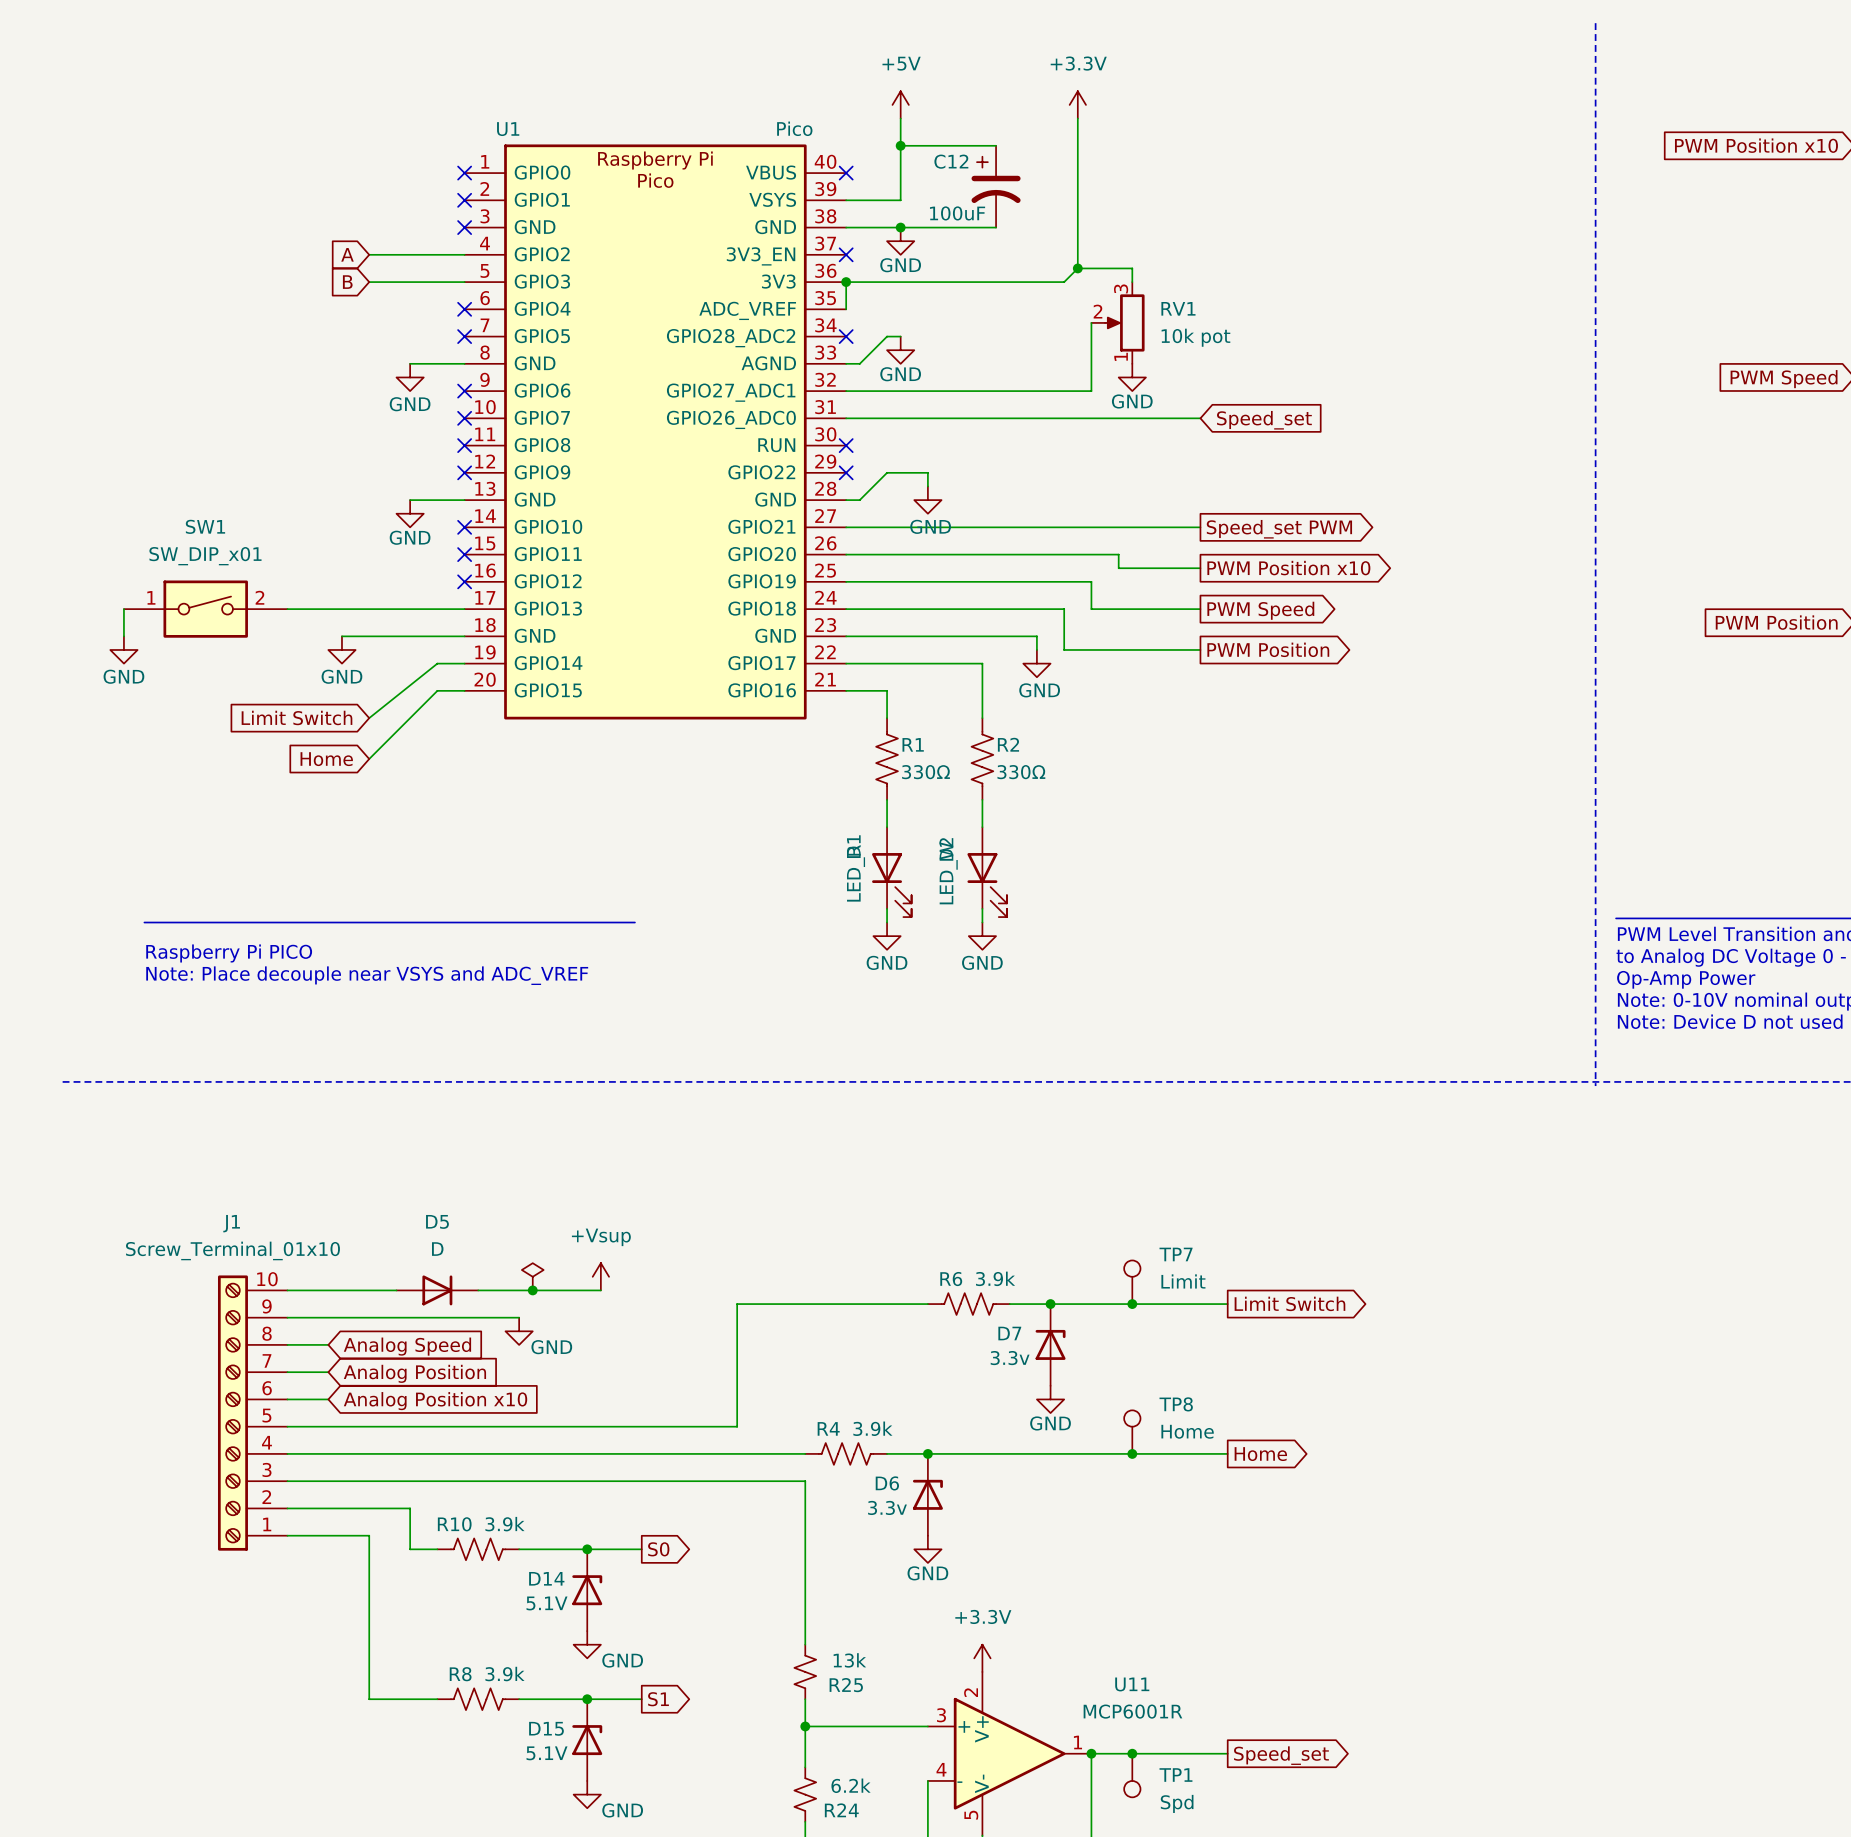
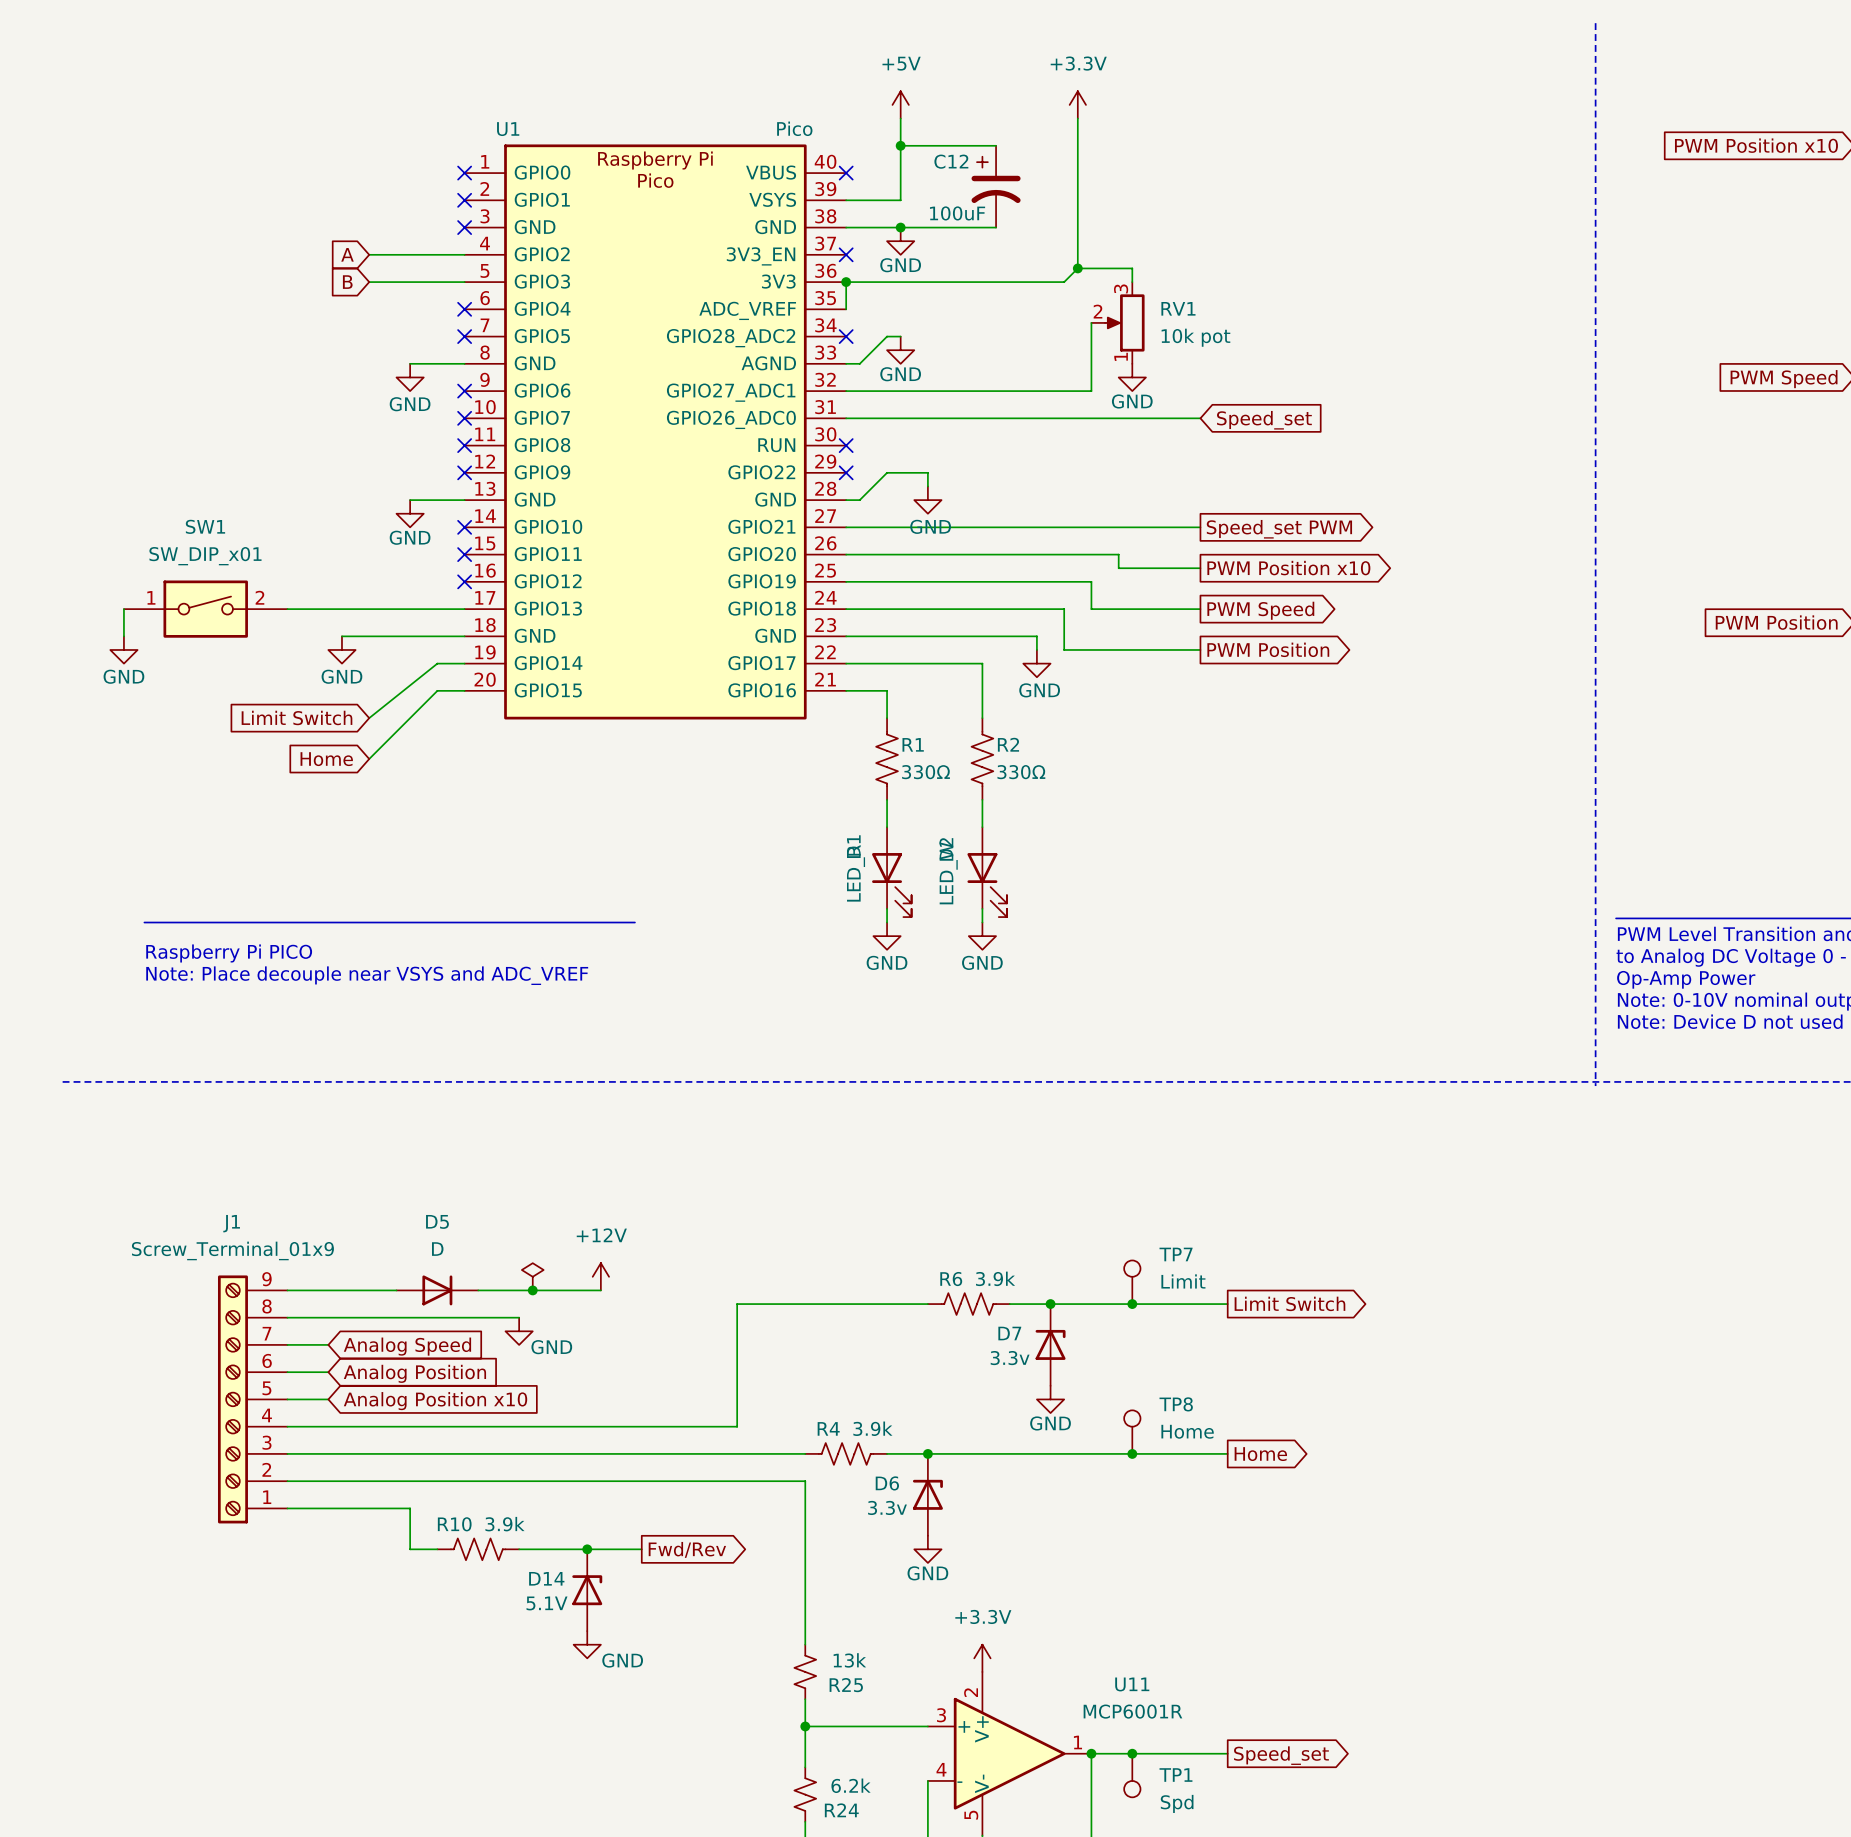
J1 value: Screw_Terminal_01x10 (232, 1250) -> Screw_Terminal_01x9 (232, 1250)
J1 symbol: [217, 1275, 288, 1551] -> [217, 1275, 288, 1524]
power symbol: +Vsup (600, 1276) -> +12V (600, 1276)
wire: (287, 1535) (369, 1535) (369, 1699) (437, 1699) -> none
global label: S0 (658, 1549) -> Fwd/Rev (687, 1549)
R8: 3.9k (478, 1699) -> none
wire: (519, 1699) (641, 1699) -> none
junction: (587, 1699) -> none
global label: S1 (658, 1699) -> none
D15: 5.1V (587, 1740) -> none
power symbol: GND (587, 1794) -> none

